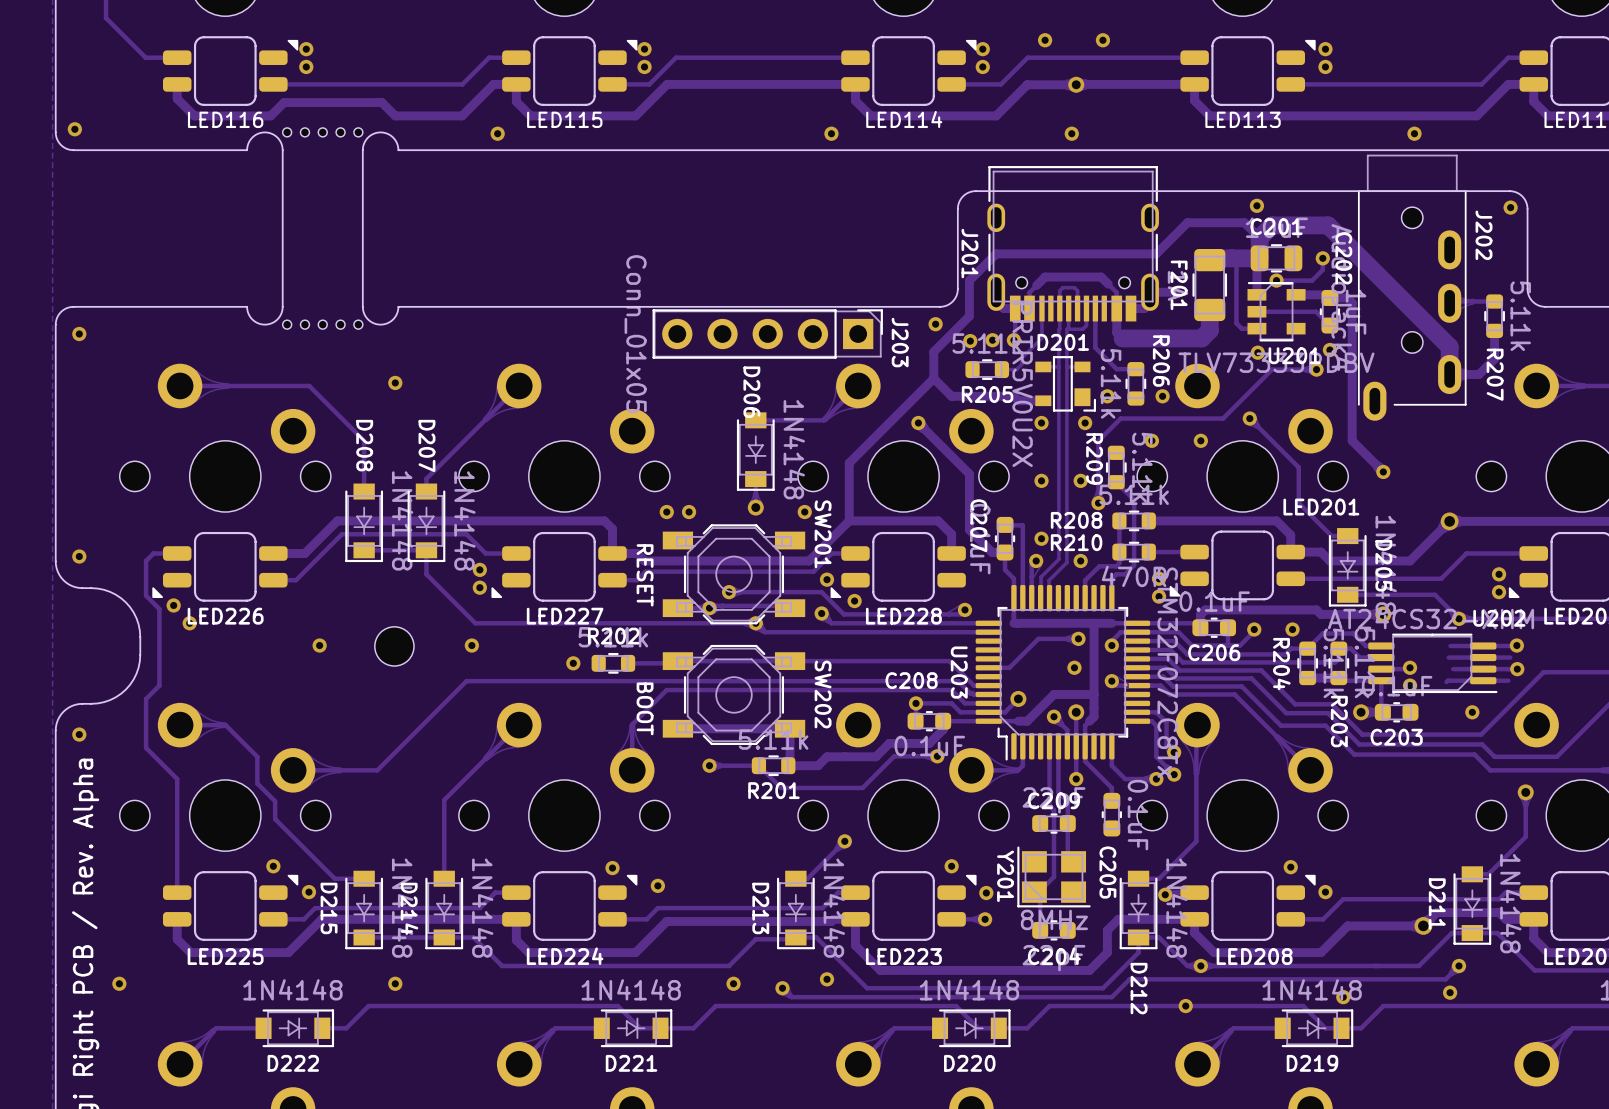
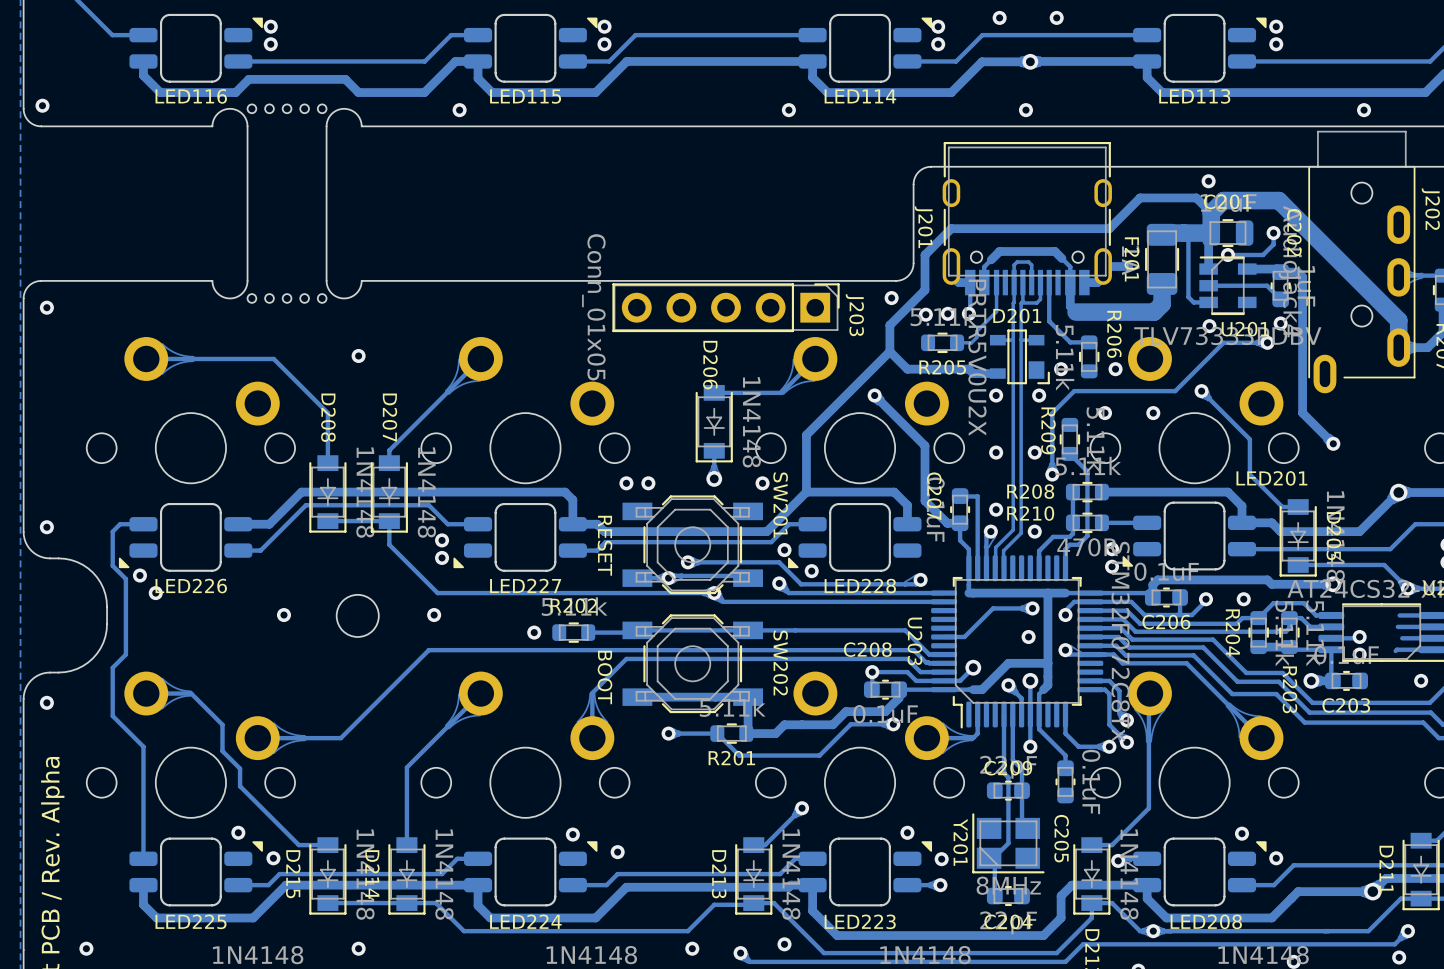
round board edge: none -> [335, 593, 380, 638]
part: (394, 646) -> none

